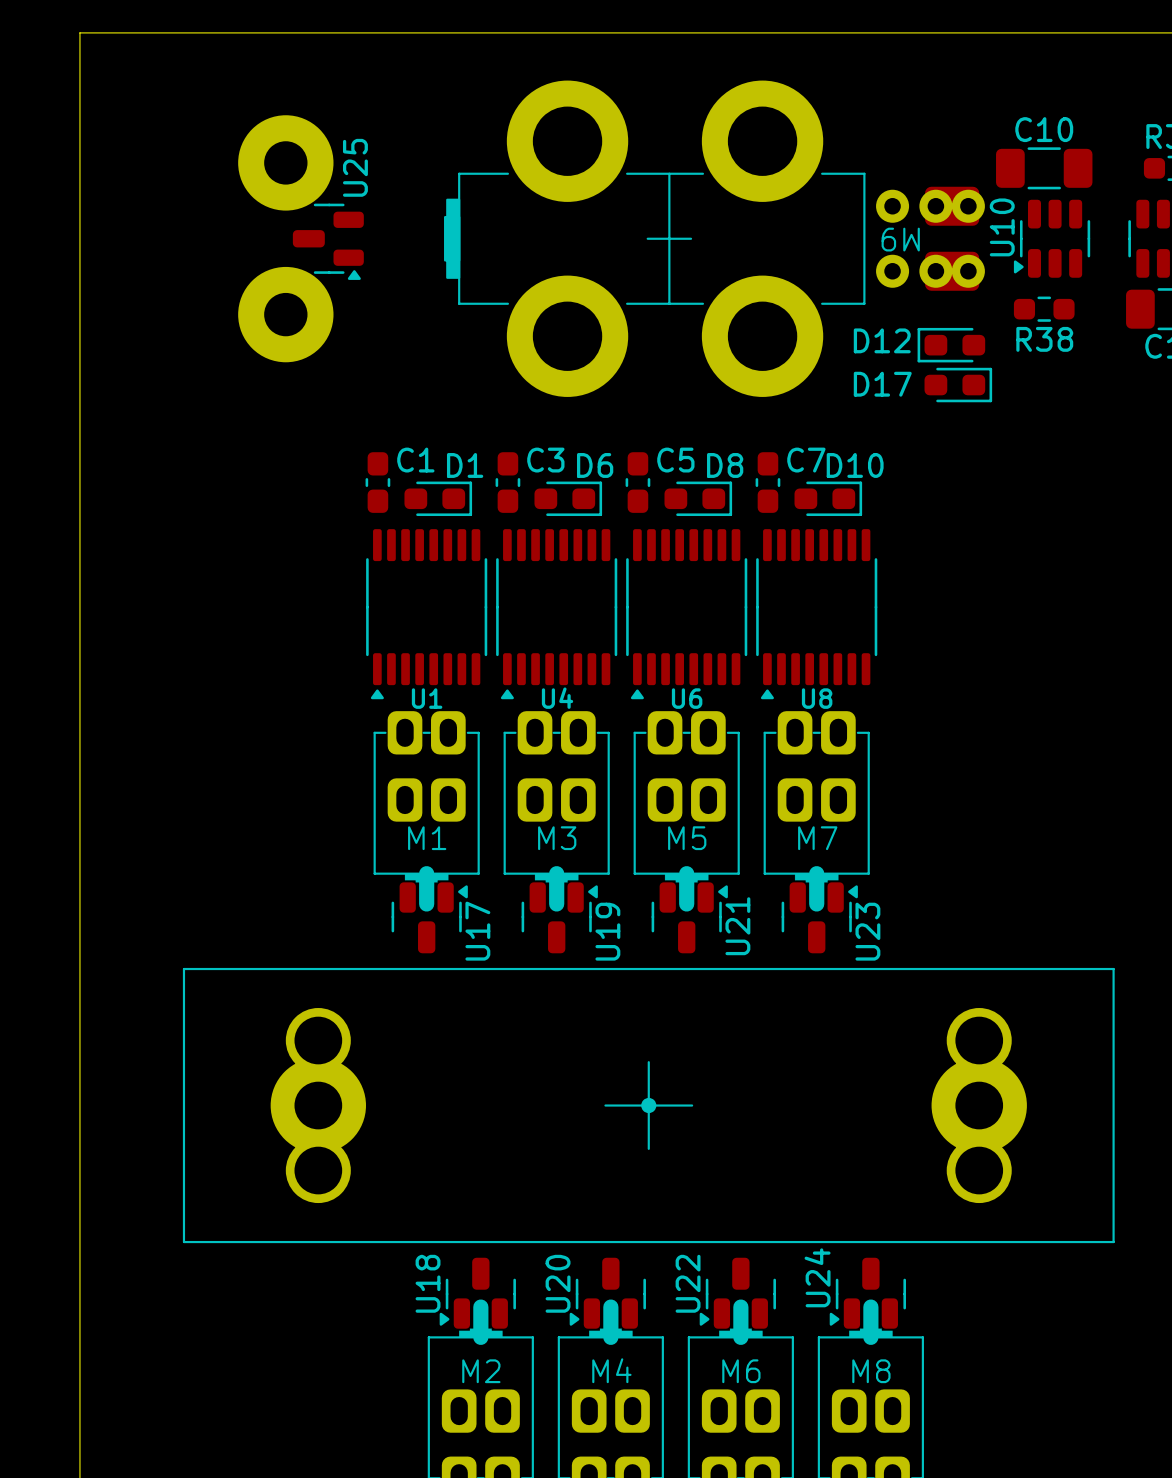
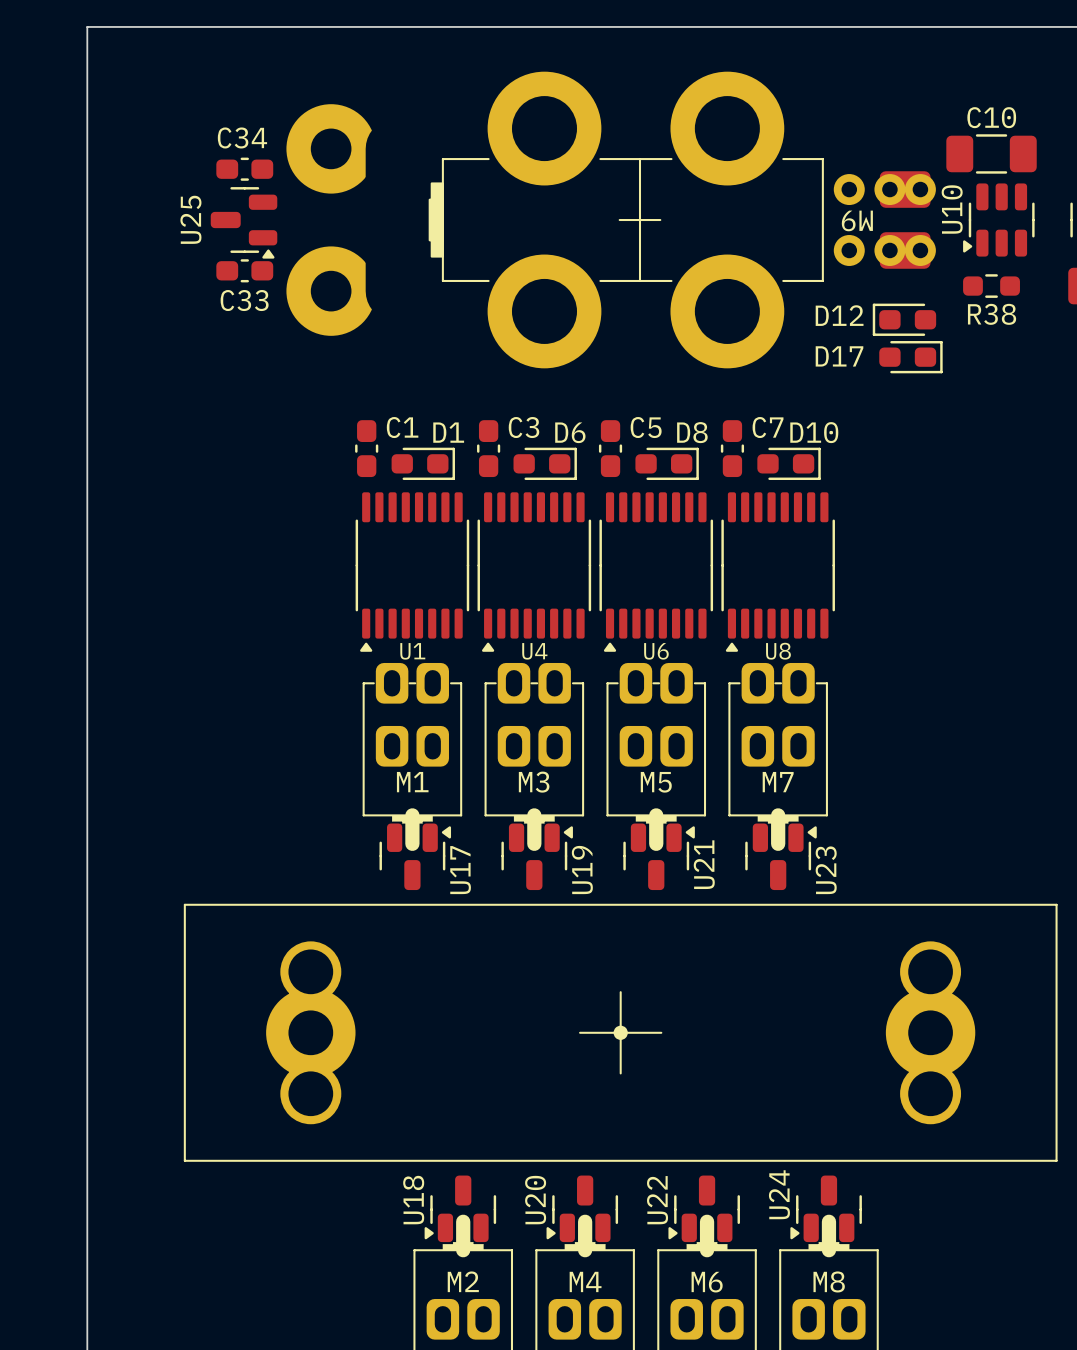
M9 footprint: [238, 80, 985, 397] -> [286, 71, 936, 369]
U25 name position: U25 (355, 167) -> U25 (190, 219)
C34: none -> (244, 169)
U25 position: (328, 241) -> (244, 222)
C33: none -> (244, 270)

